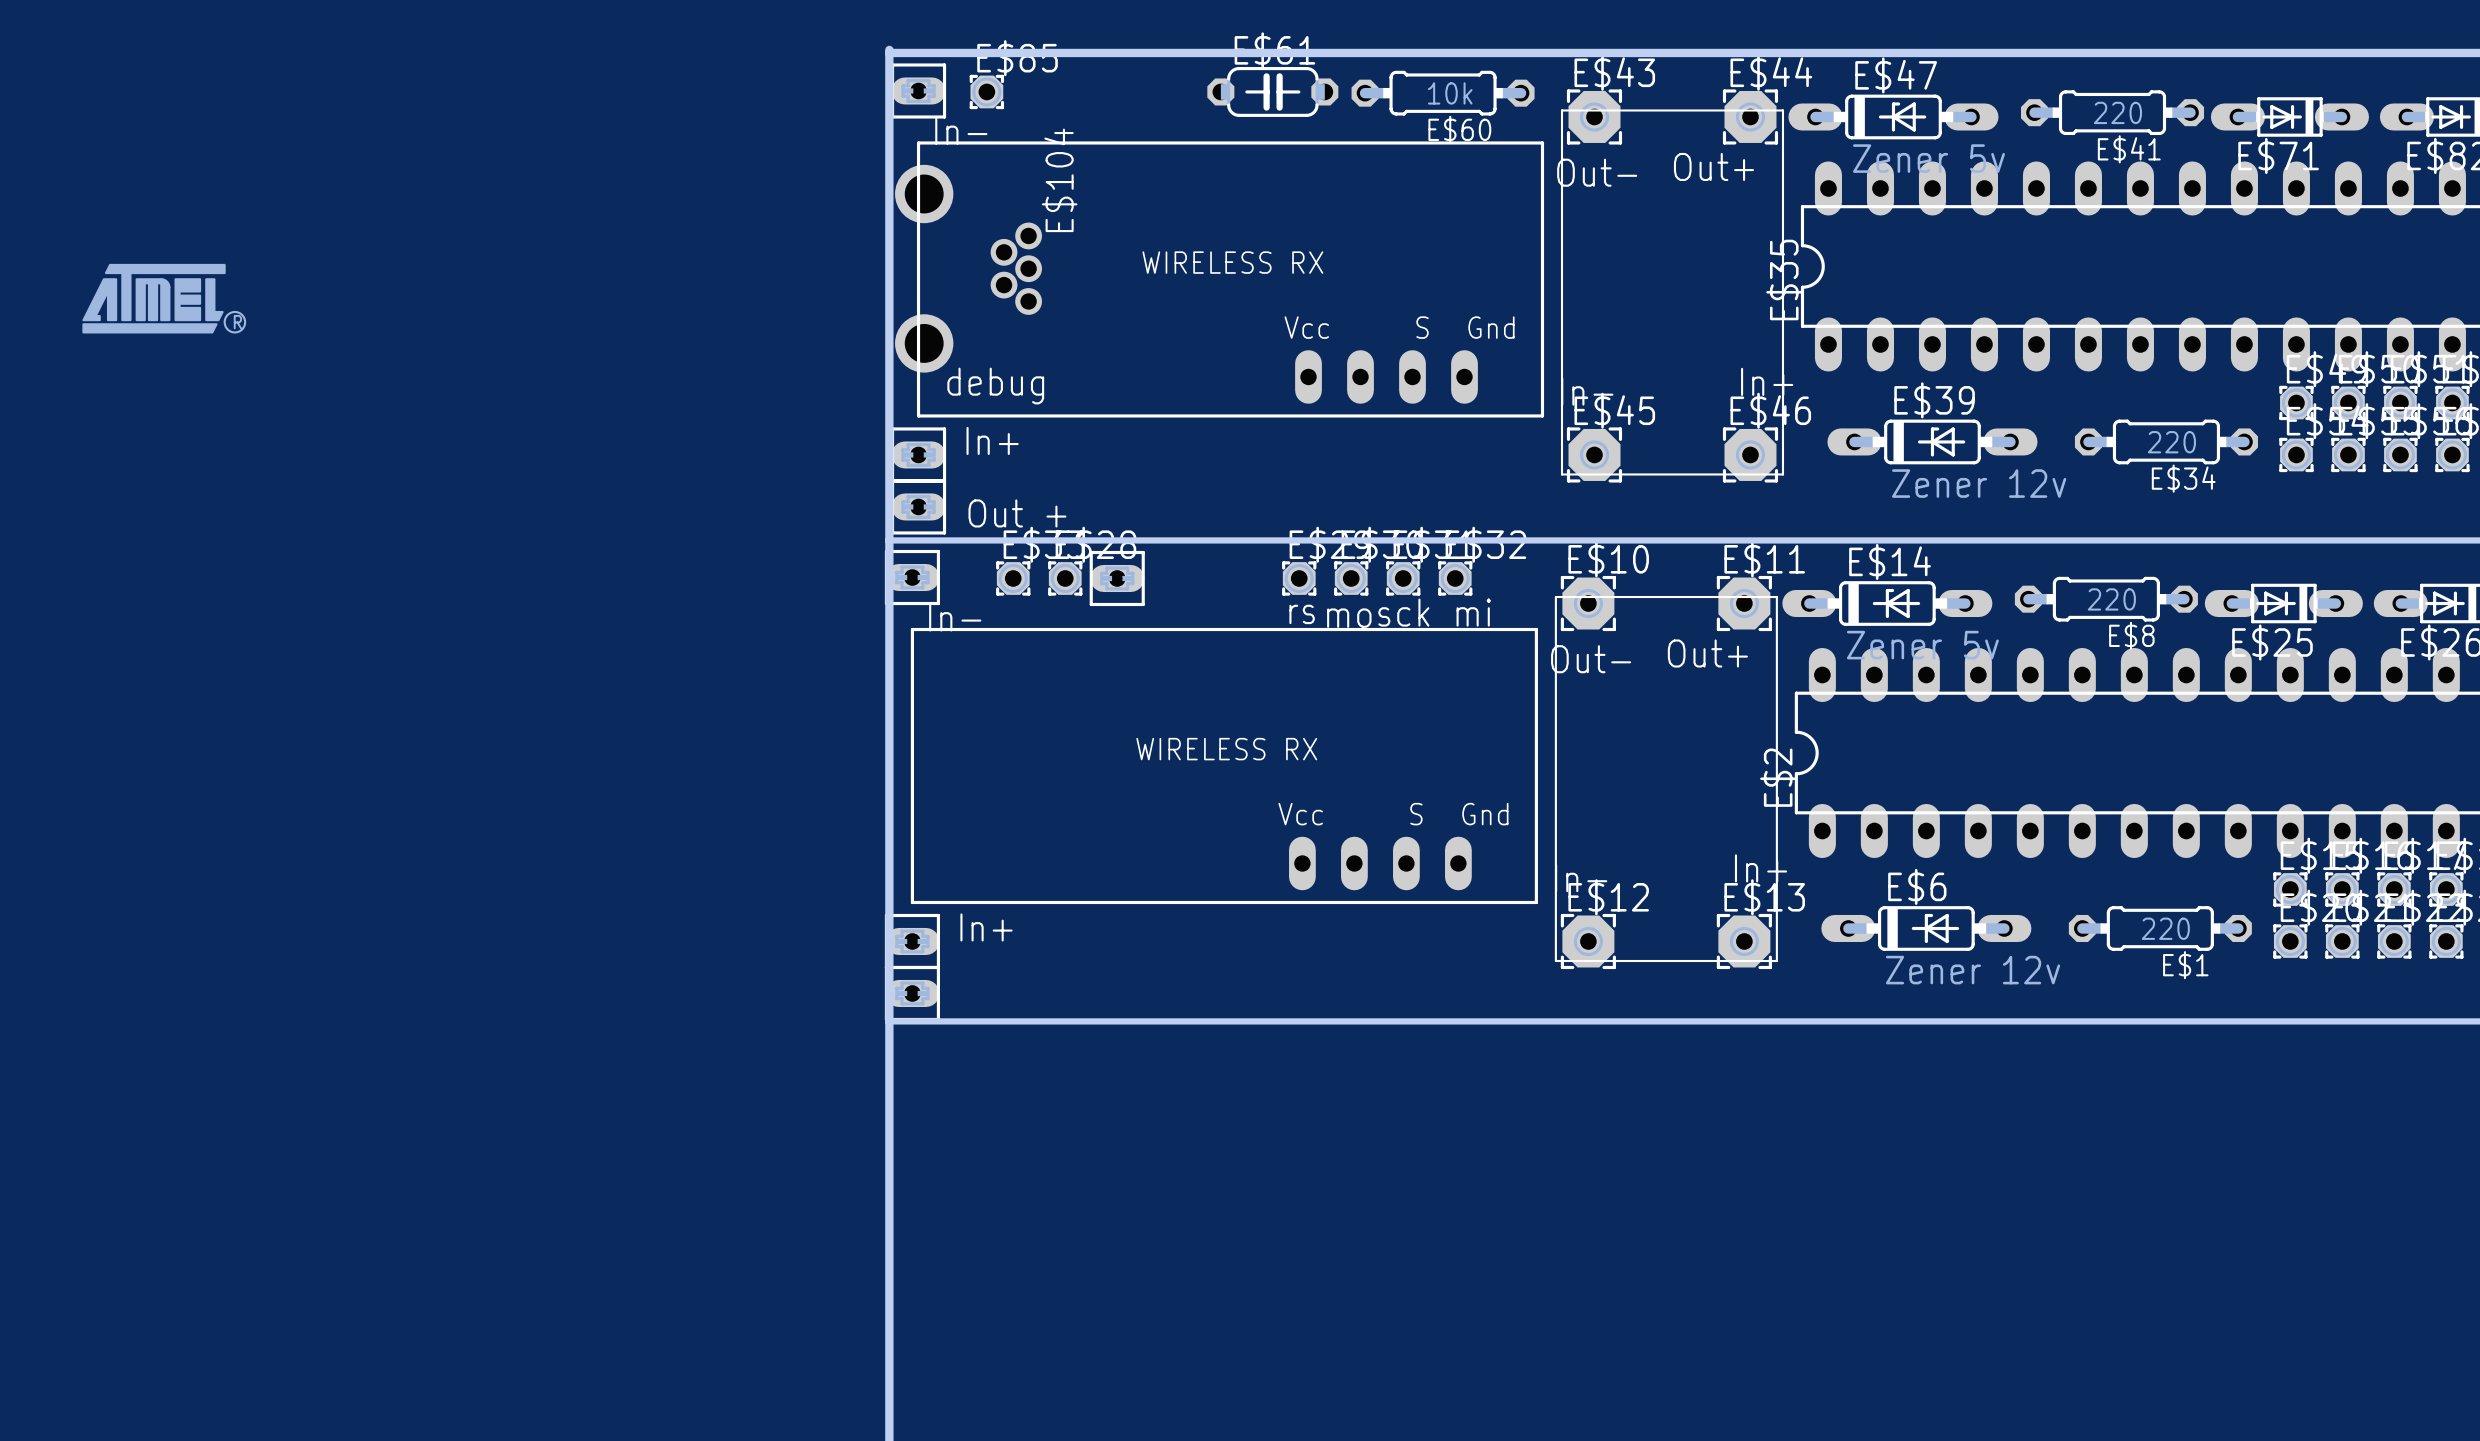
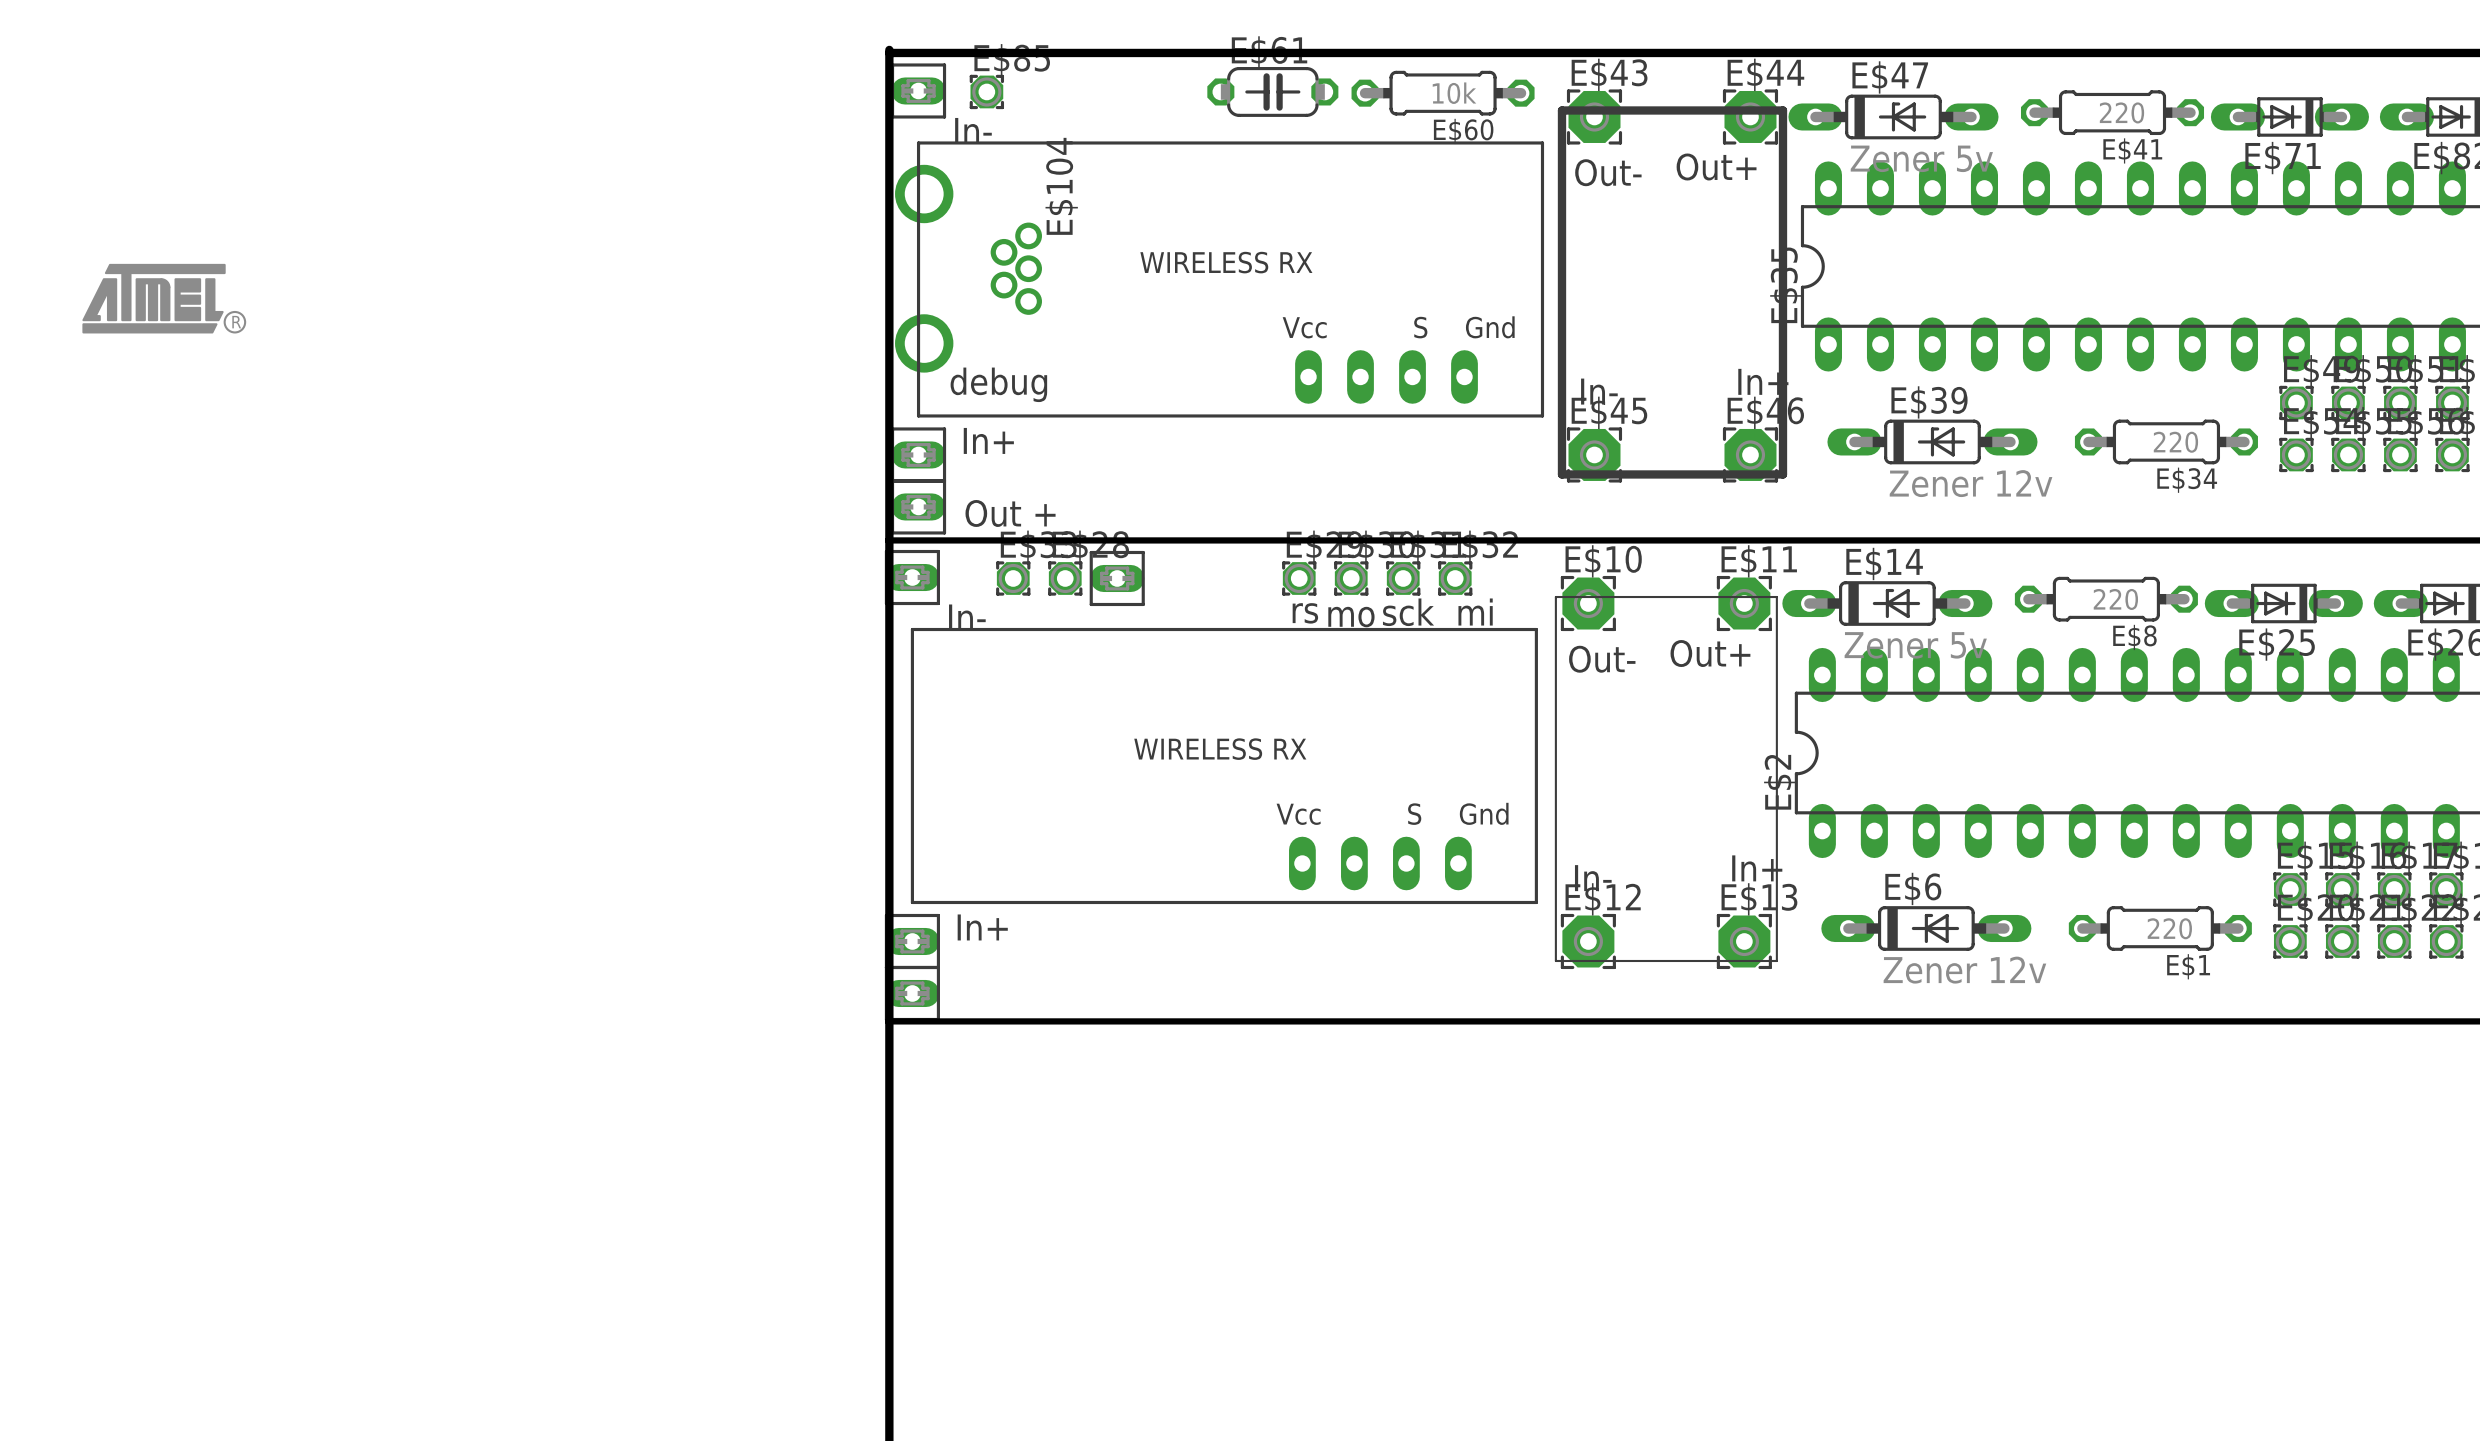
line width: thin (1561, 110) (1561, 474) (1782, 474) (1782, 110) (1561, 110) -> thick (1561, 110) (1561, 474) (1782, 474) (1782, 110) (1561, 110)

